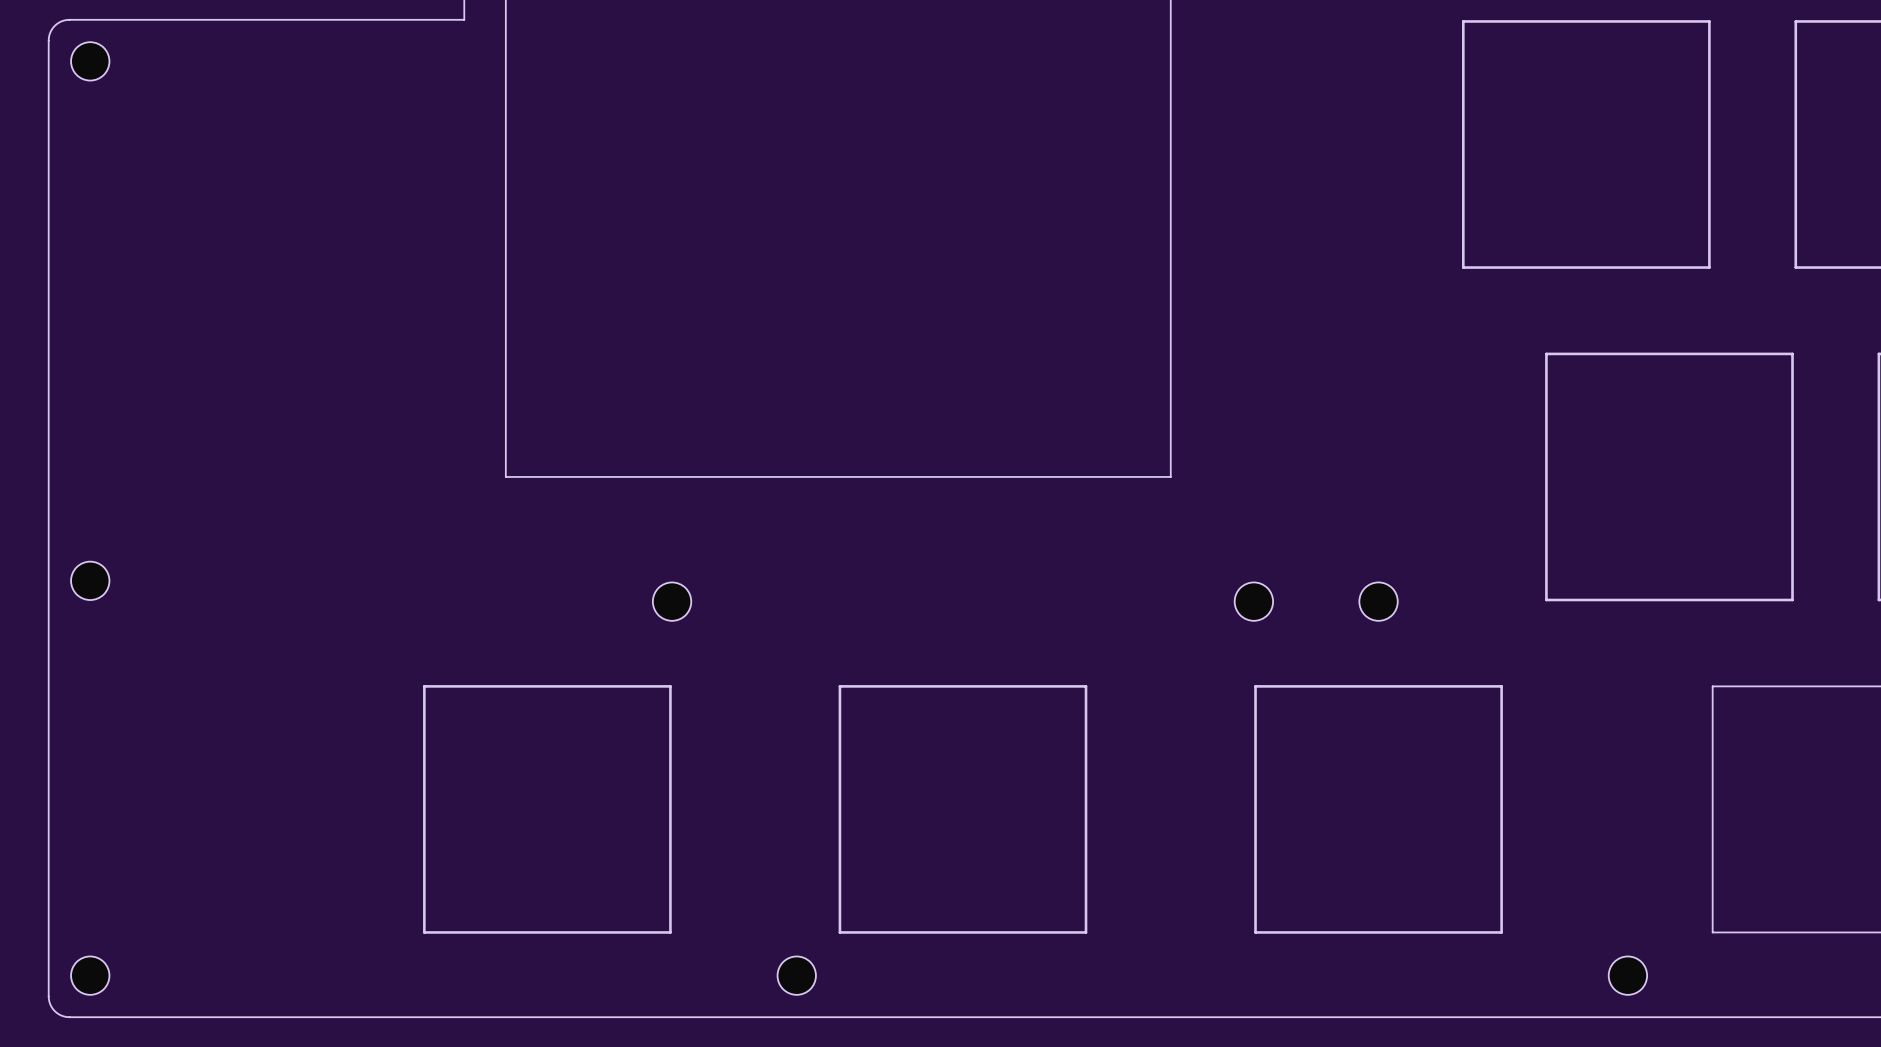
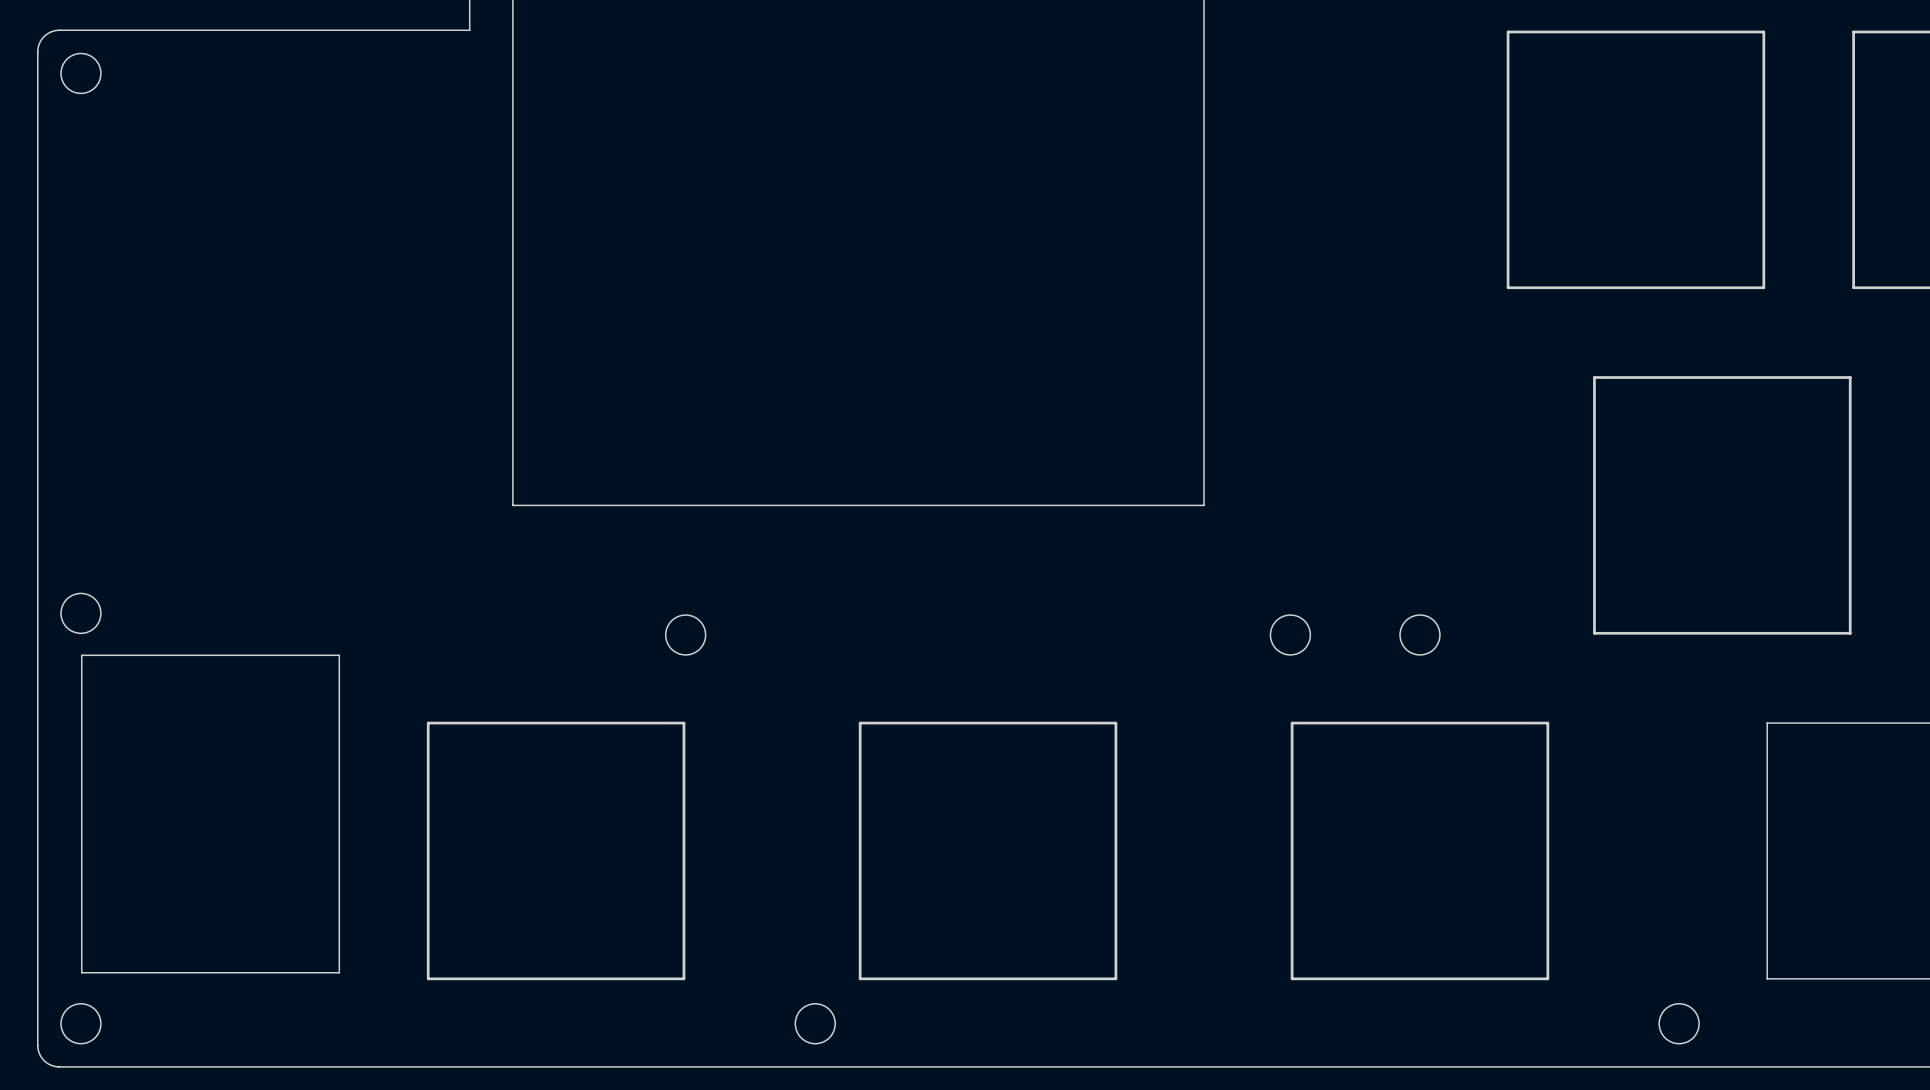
drawing: none -> [81, 654, 341, 974]

